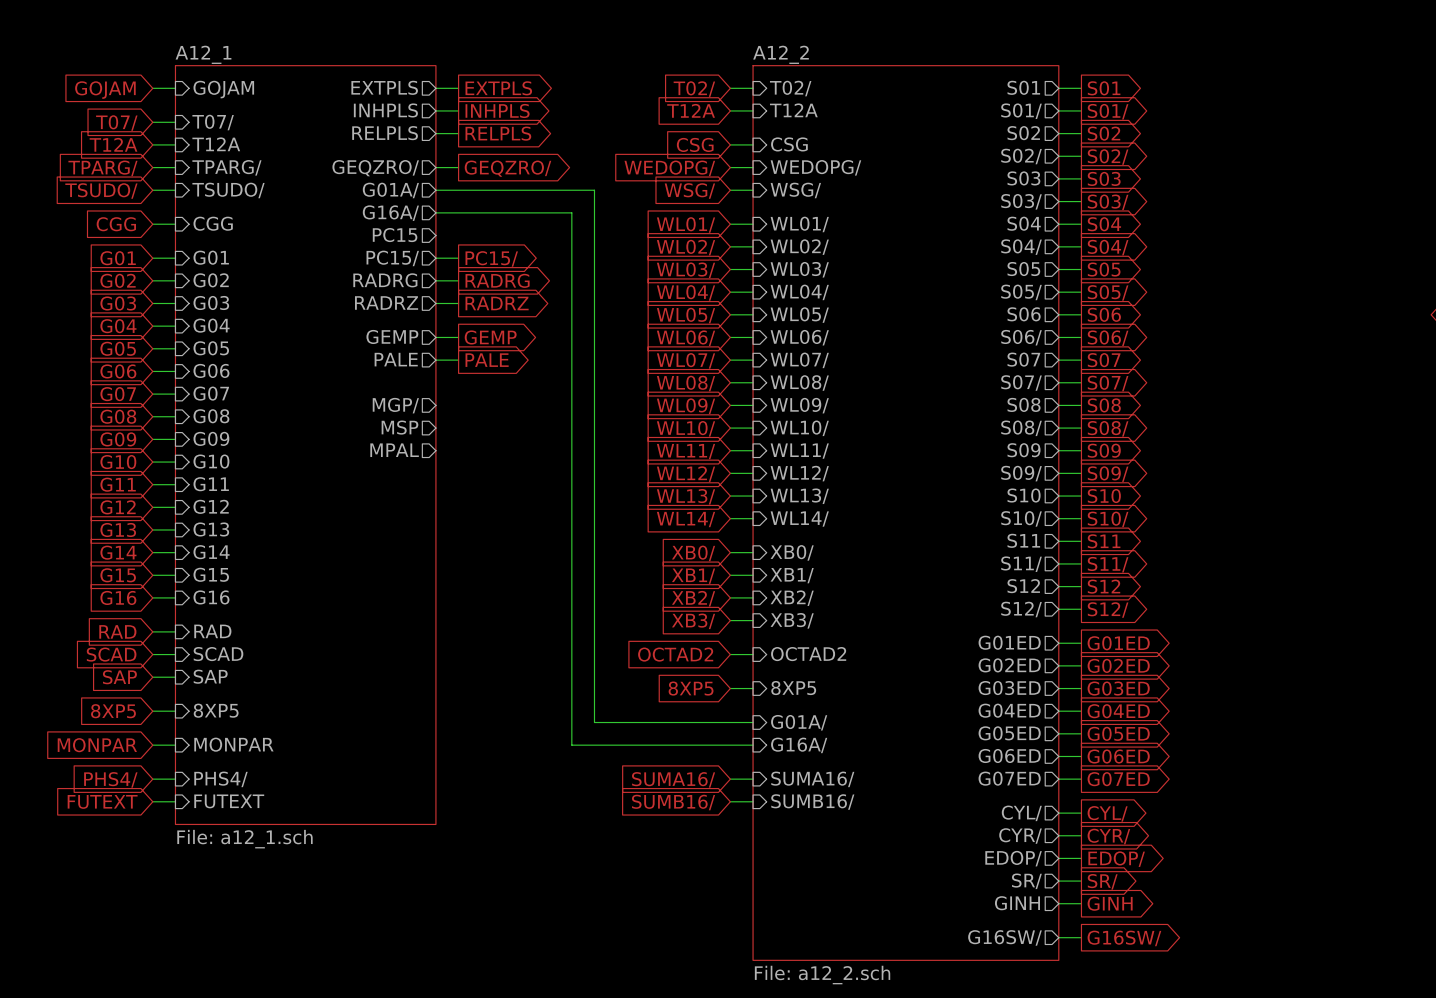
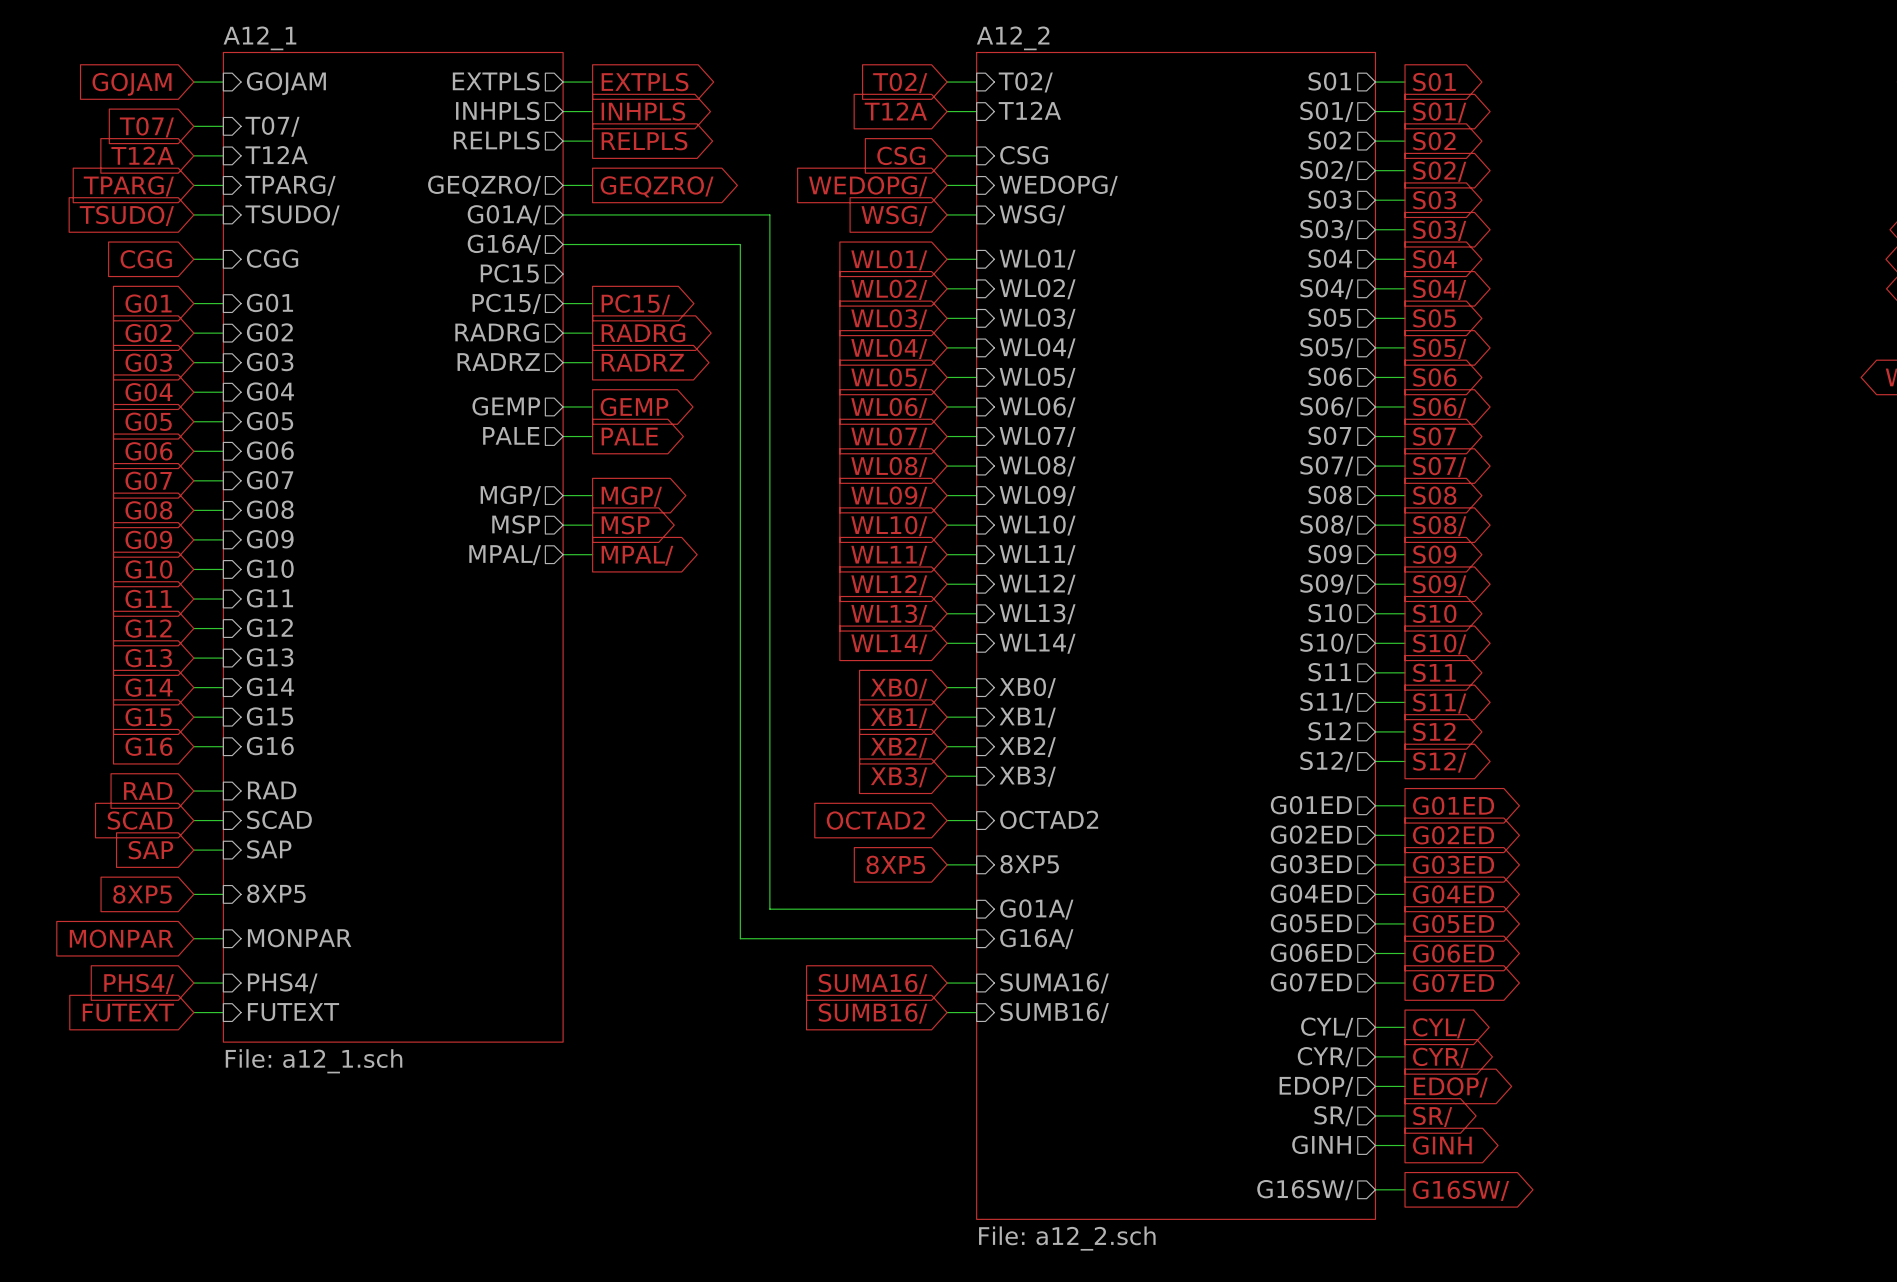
wire: none -> (563, 495) (592, 495)
global label: none -> MGP/ (631, 496)
wire: none -> (563, 525) (592, 525)
global label: none -> MSP (625, 525)
sheet pin: MPAL (394, 450) -> MPAL/ (505, 555)
wire: none -> (563, 554) (592, 554)
global label: none -> MPAL/ (637, 555)

